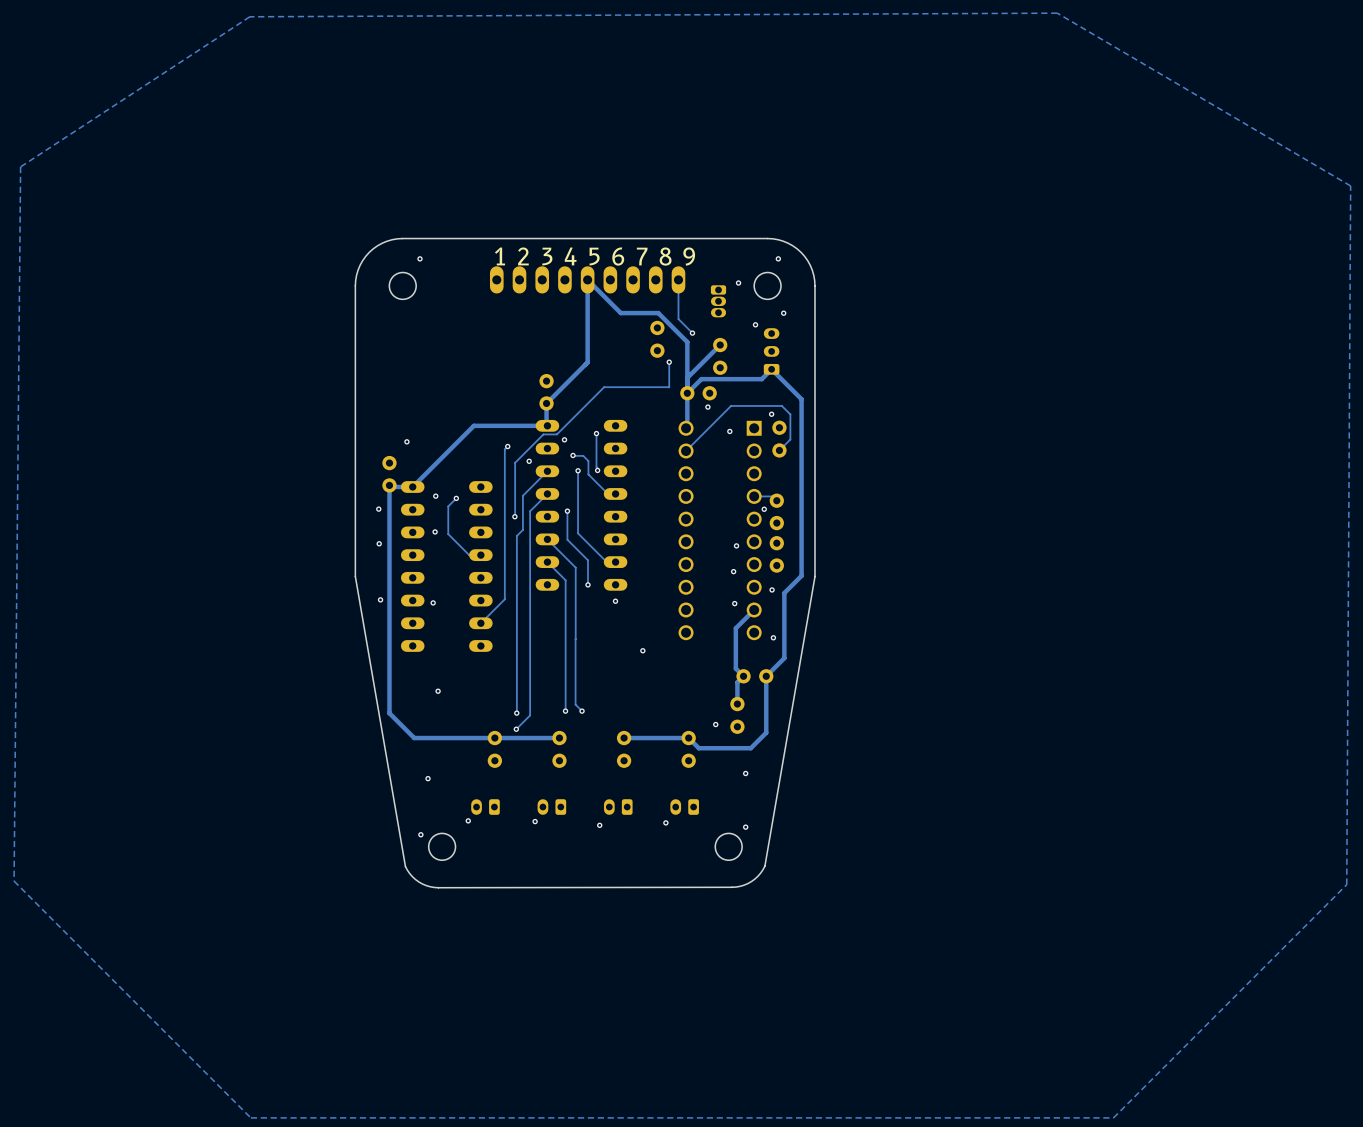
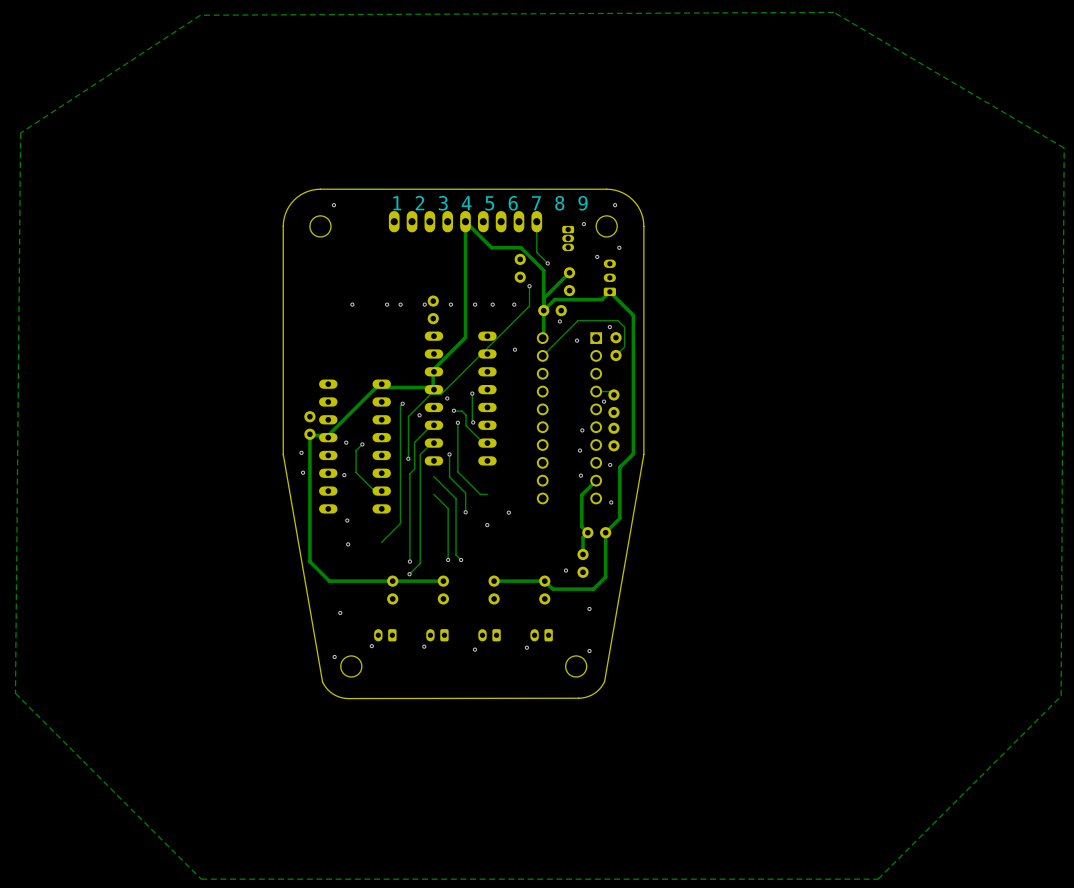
track: (587, 362) (546, 403) (547, 425) (473, 425) (412, 486) (389, 485) (389, 713) -> (465, 286) (465, 337) (433, 369) (433, 387) (376, 387) (328, 435) (309, 434) (309, 561)
via: none -> (352, 304)
via: none -> (387, 304)
via: none -> (400, 304)
via: none -> (424, 304)
via: none -> (450, 304)
via: none -> (475, 304)
via: none -> (492, 304)
via: none -> (514, 304)
track: (669, 387) (604, 387) (556, 434) (543, 434) (515, 462) (514, 516) -> (529, 306) (441, 394) (430, 394) (408, 416) (408, 458)
track: (596, 433) (597, 470) -> (472, 393) (473, 422)
via: (596, 433) -> none
via: (564, 439) -> none
via: (406, 441) -> none
via: none -> (514, 349)
track: (507, 445) (504, 449) (504, 599) (480, 623) -> (402, 403) (400, 406) (400, 523) (381, 542)
via: (507, 446) -> none
track: (573, 455) (583, 455) (588, 461) (588, 474) (607, 493) (615, 493) -> (453, 410) (461, 411) (466, 415) (466, 425) (481, 440) (487, 440)
via: (573, 455) -> none
via: (529, 461) -> none
track: (578, 470) (578, 533) (606, 562) (615, 562) -> (457, 422) (457, 471) (480, 494) (487, 494)
via: (578, 470) -> none
via: (597, 470) -> none
track: (547, 471) (522, 495) (522, 529) (516, 535) (516, 713) -> (433, 423) (414, 442) (414, 469) (409, 473) (409, 561)
part position: (389, 474) -> (309, 425)
track: (547, 493) (530, 511) (529, 715) -> (433, 440) (420, 454) (420, 563)
via: (435, 496) -> none
track: (456, 498) (448, 506) (448, 534) (469, 555) (480, 555) -> (362, 444) (356, 450) (356, 472) (372, 488) (381, 488)
via: (456, 498) -> none
via: none -> (472, 393)
via: none -> (447, 398)
via: (378, 509) -> none
via: none -> (402, 403)
track: (567, 511) (567, 539) (588, 560) (588, 584) -> (449, 454) (449, 476) (465, 493) (465, 512)
via: (567, 511) -> none
via: (514, 516) -> none
via: none -> (453, 410)
via: none -> (419, 415)
via: (435, 531) -> none
via: none -> (473, 422)
via: none -> (457, 422)
track: (547, 539) (575, 567) (575, 639) -> (433, 476) (456, 498) (456, 503)
via: (379, 543) -> none
via: none -> (346, 442)
track: (547, 562) (565, 580) (565, 711) -> (433, 494) (448, 508) (448, 560)
via: none -> (362, 444)
via: none -> (301, 452)
via: none -> (408, 458)
via position: (588, 584) -> (449, 454)
via: (615, 601) -> none
via: none -> (465, 512)
via: none -> (347, 520)
via: none -> (487, 525)

